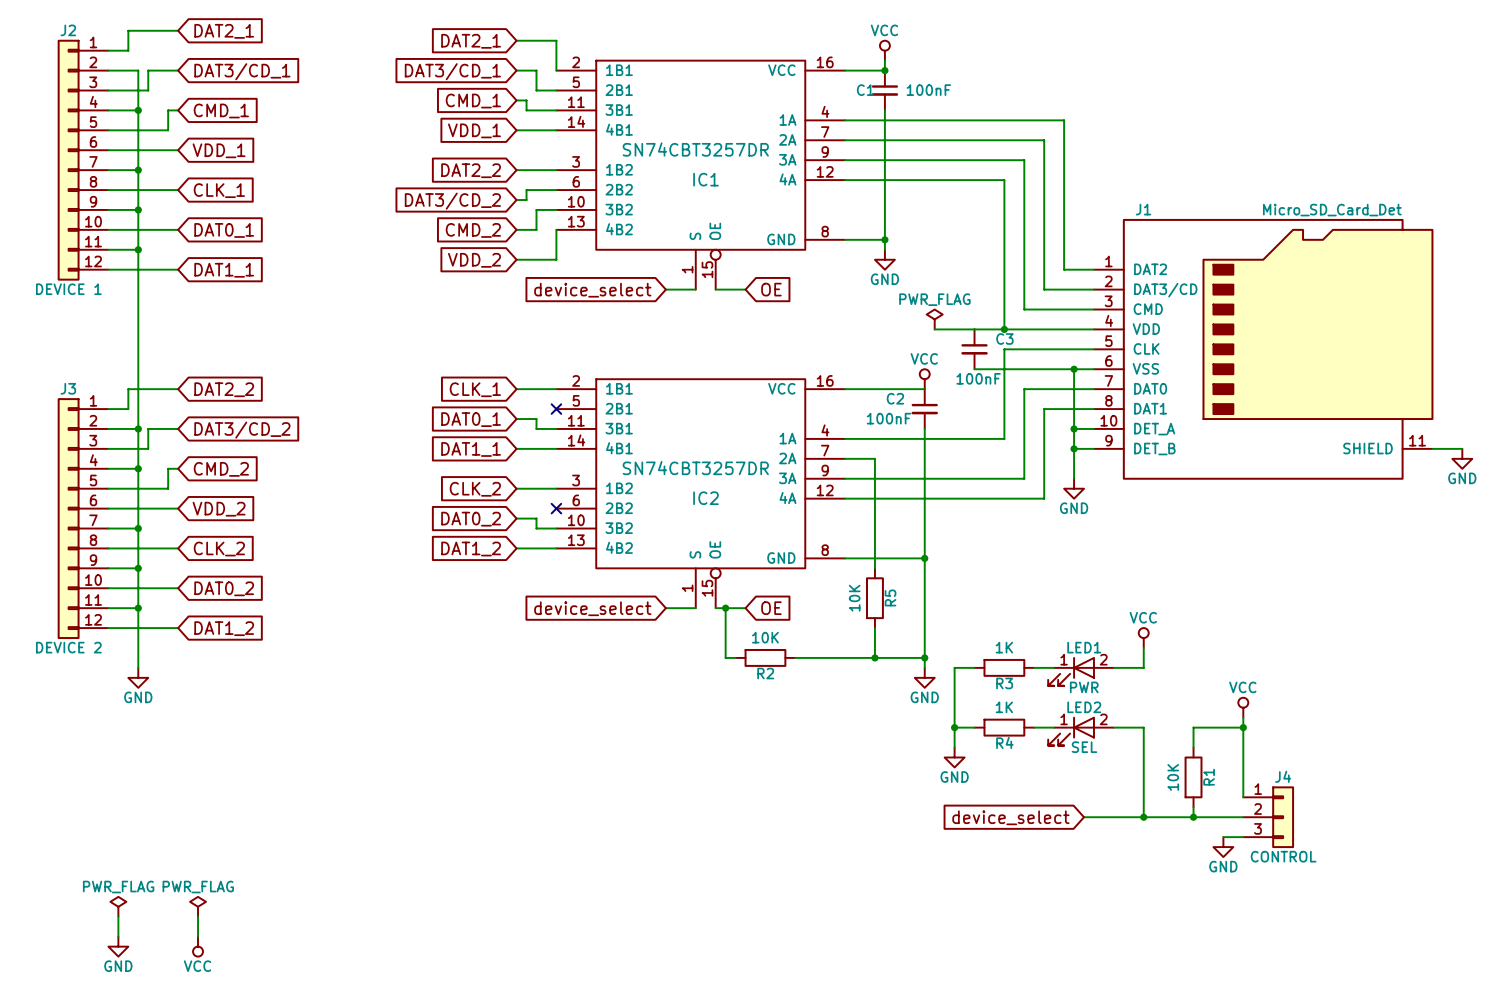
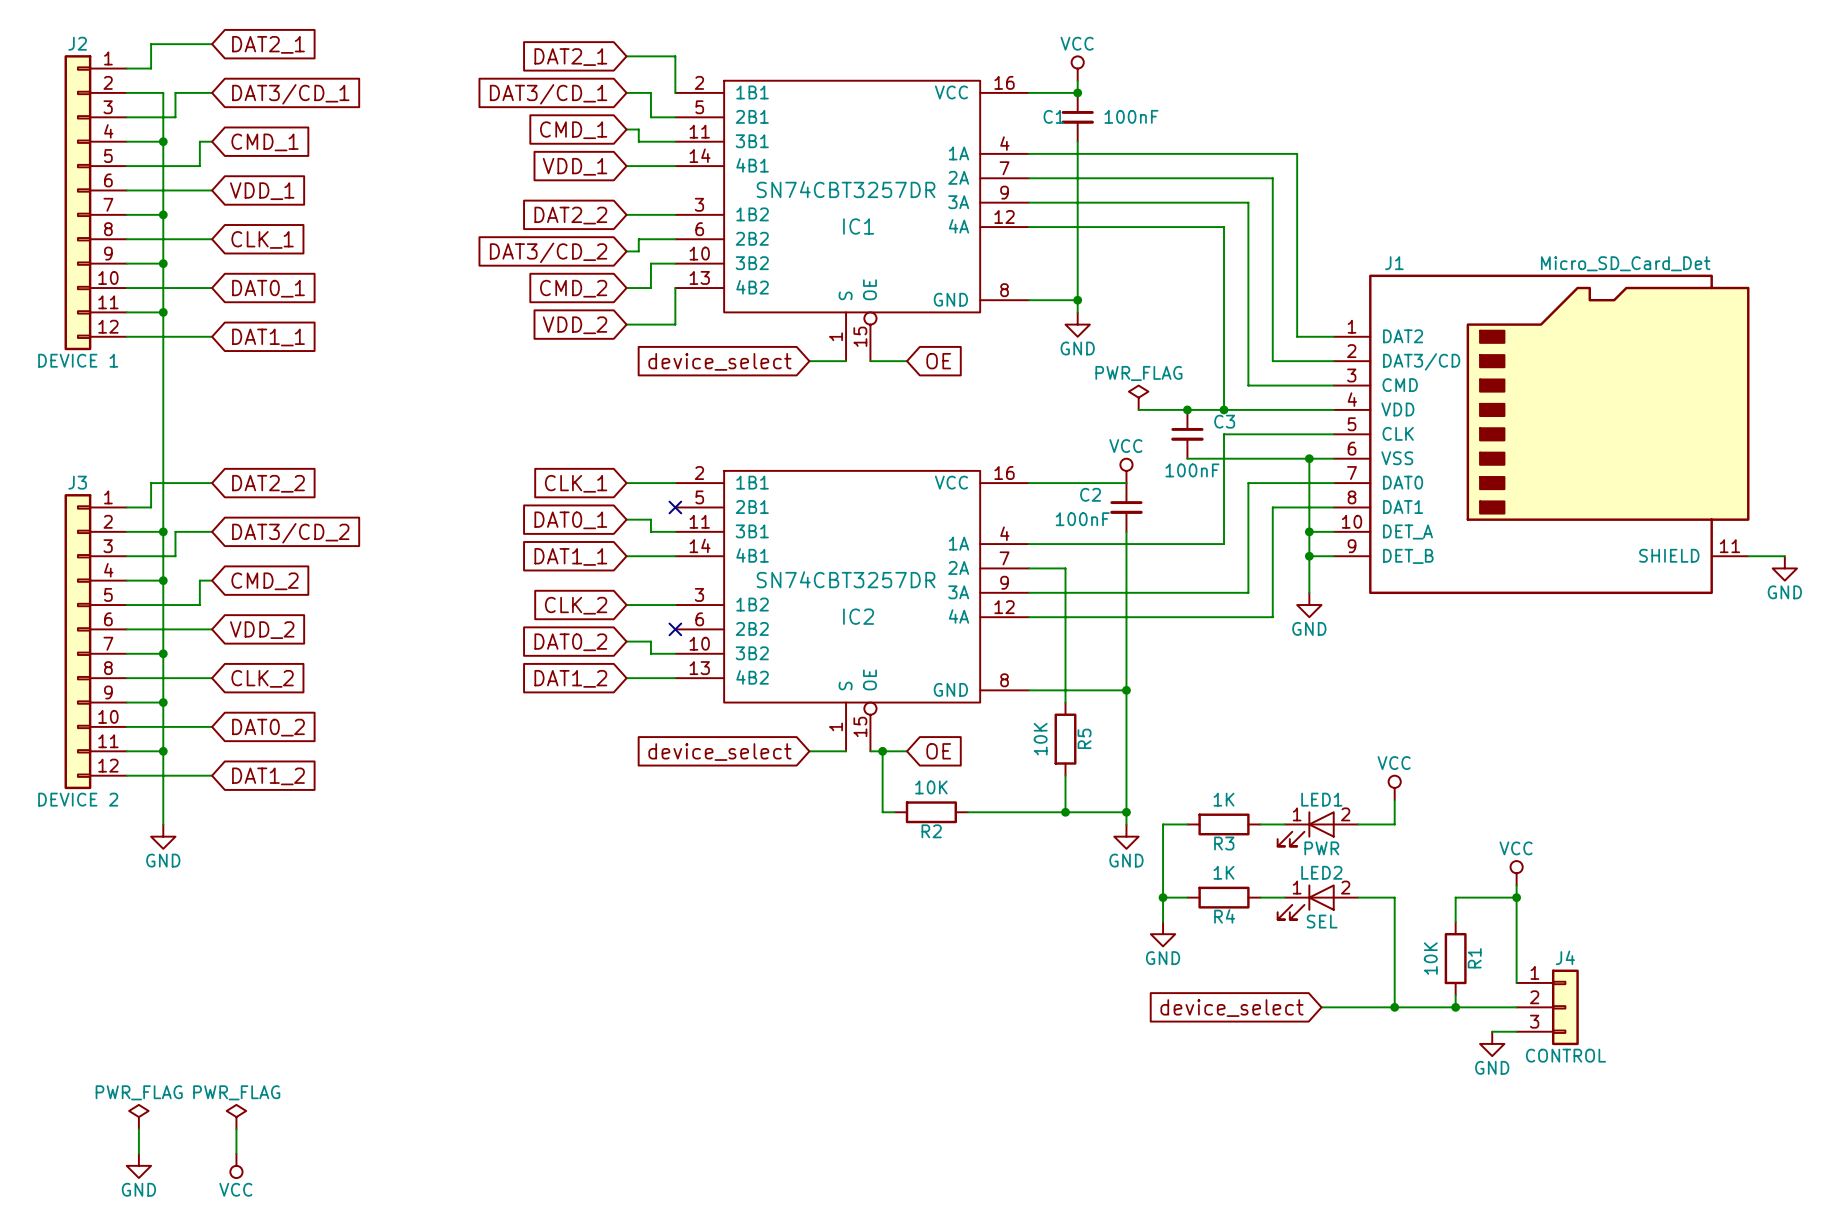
junction: none -> (1187, 409)

